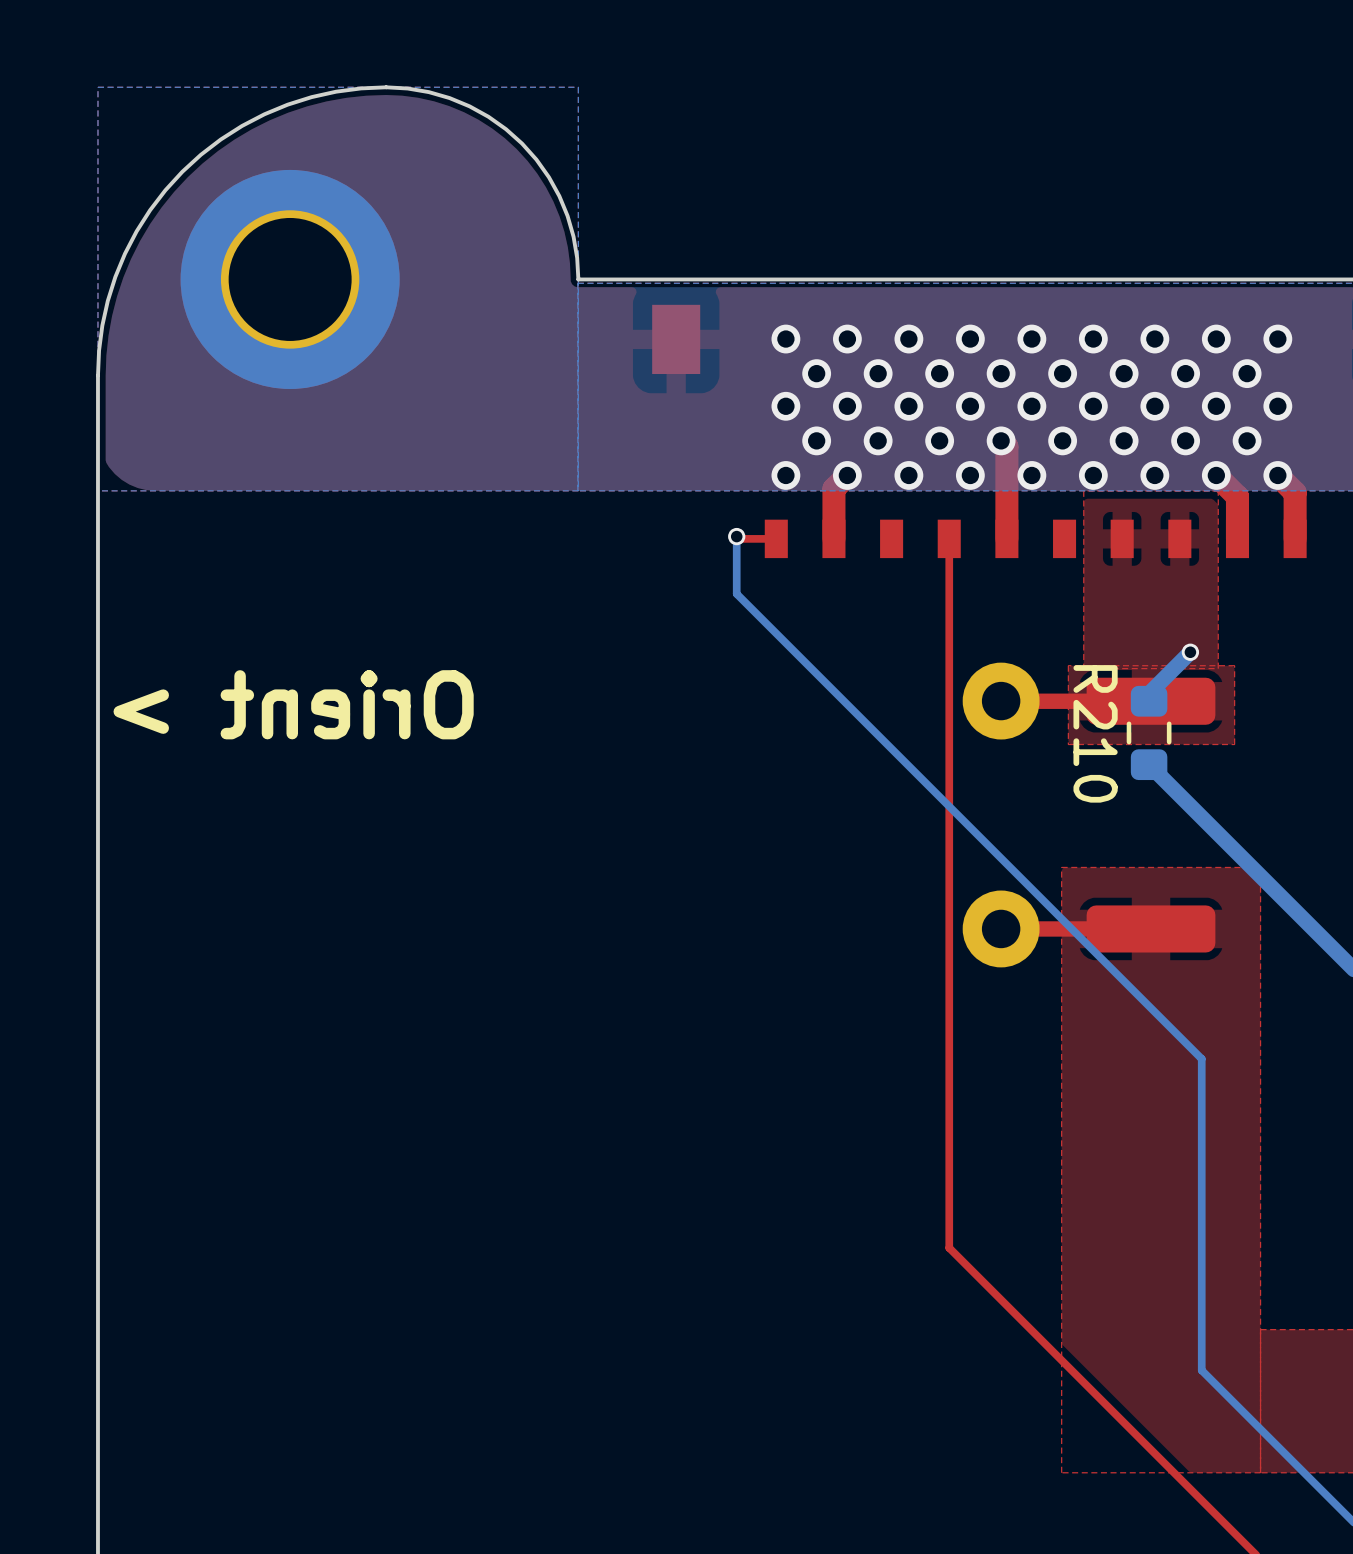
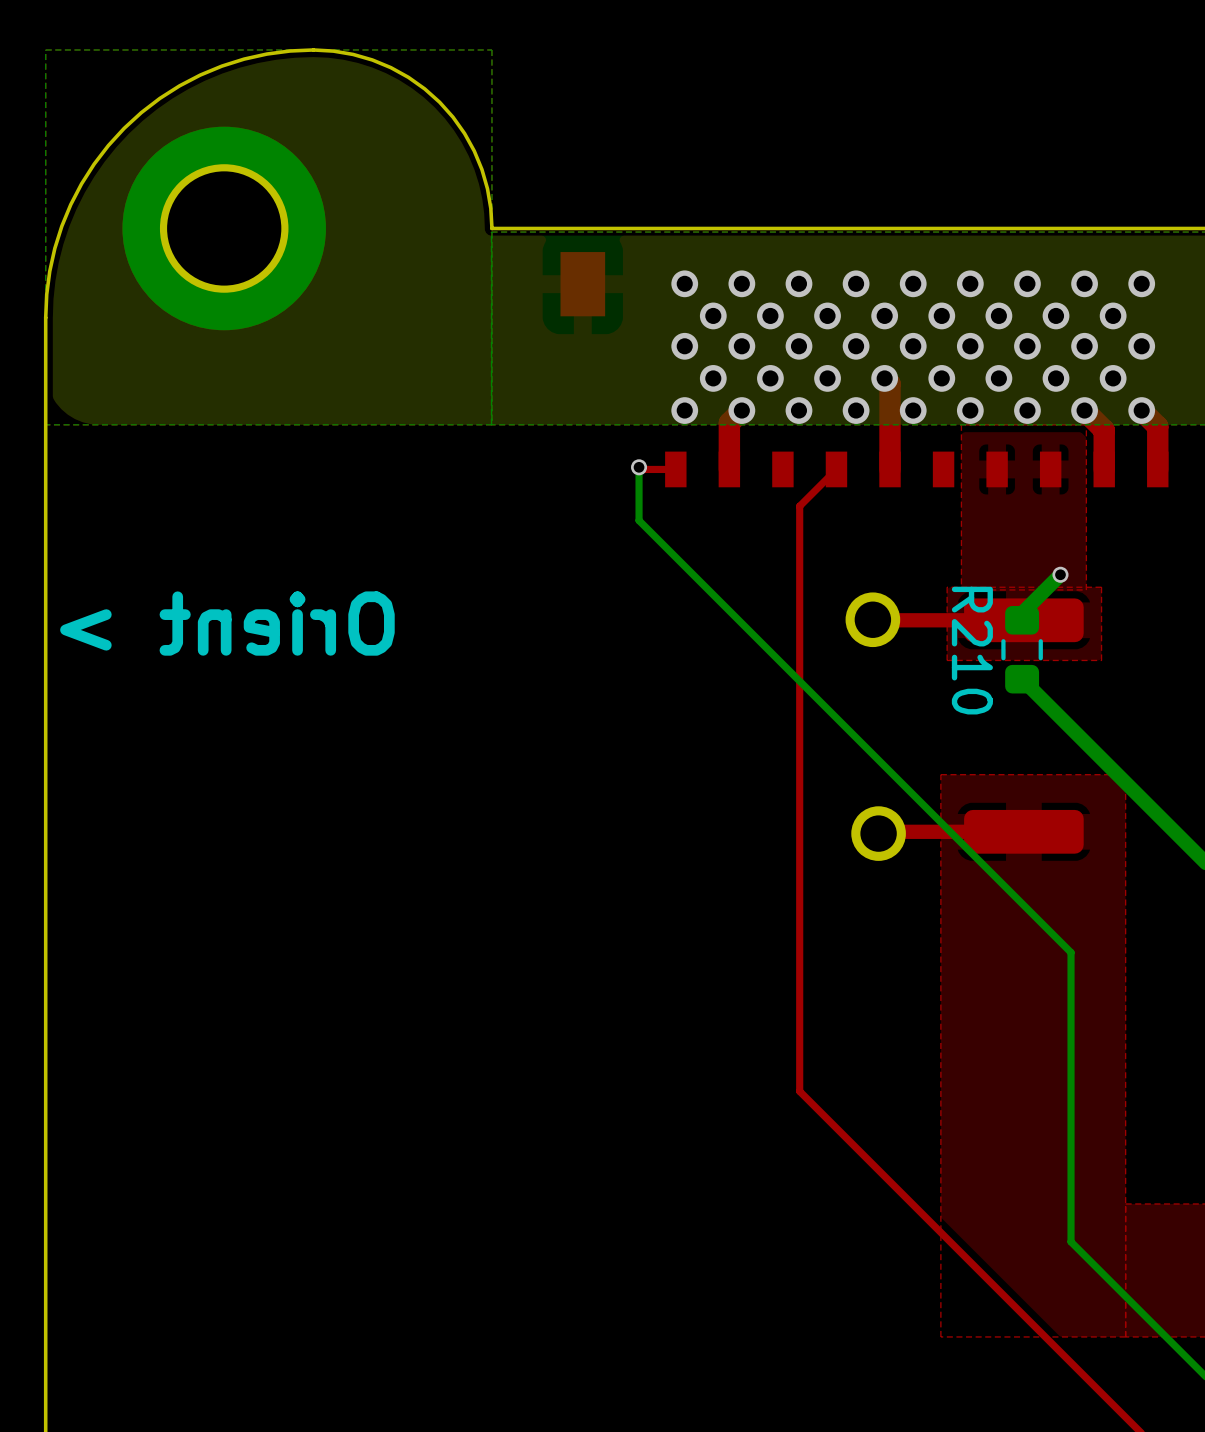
top track: (949, 538) (949, 1247) -> (836, 469) (799, 506) (799, 1091) (836, 1128)
part footprint: [962, 662, 1040, 740] -> [845, 592, 901, 648]
part footprint: [962, 890, 1040, 968] -> [851, 806, 906, 861]

